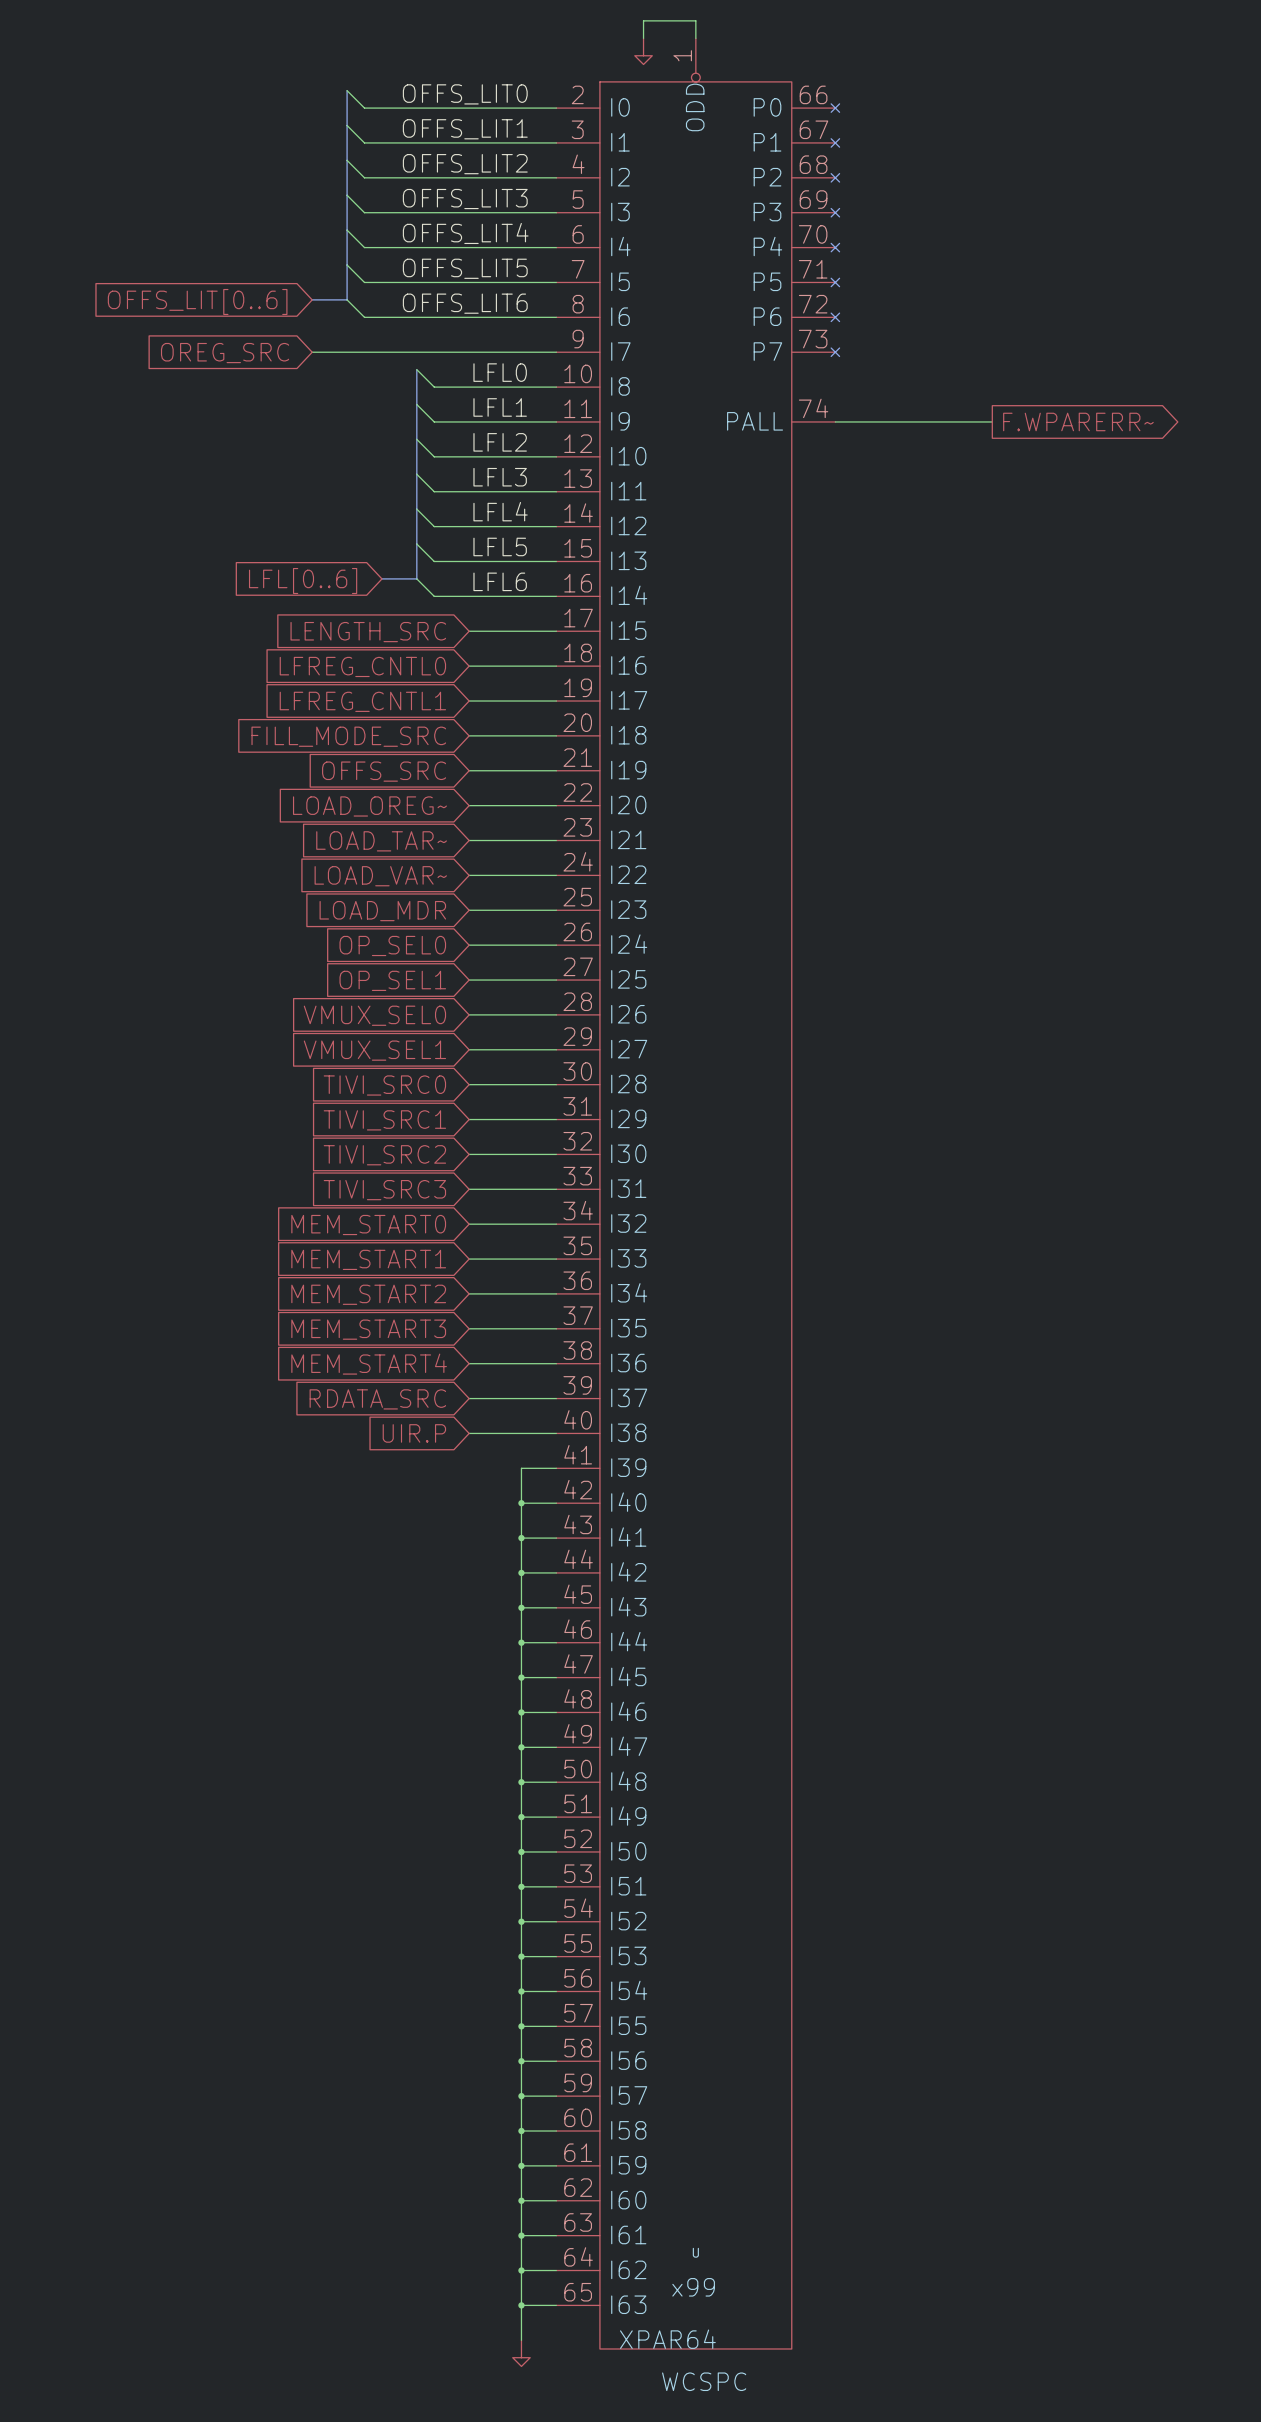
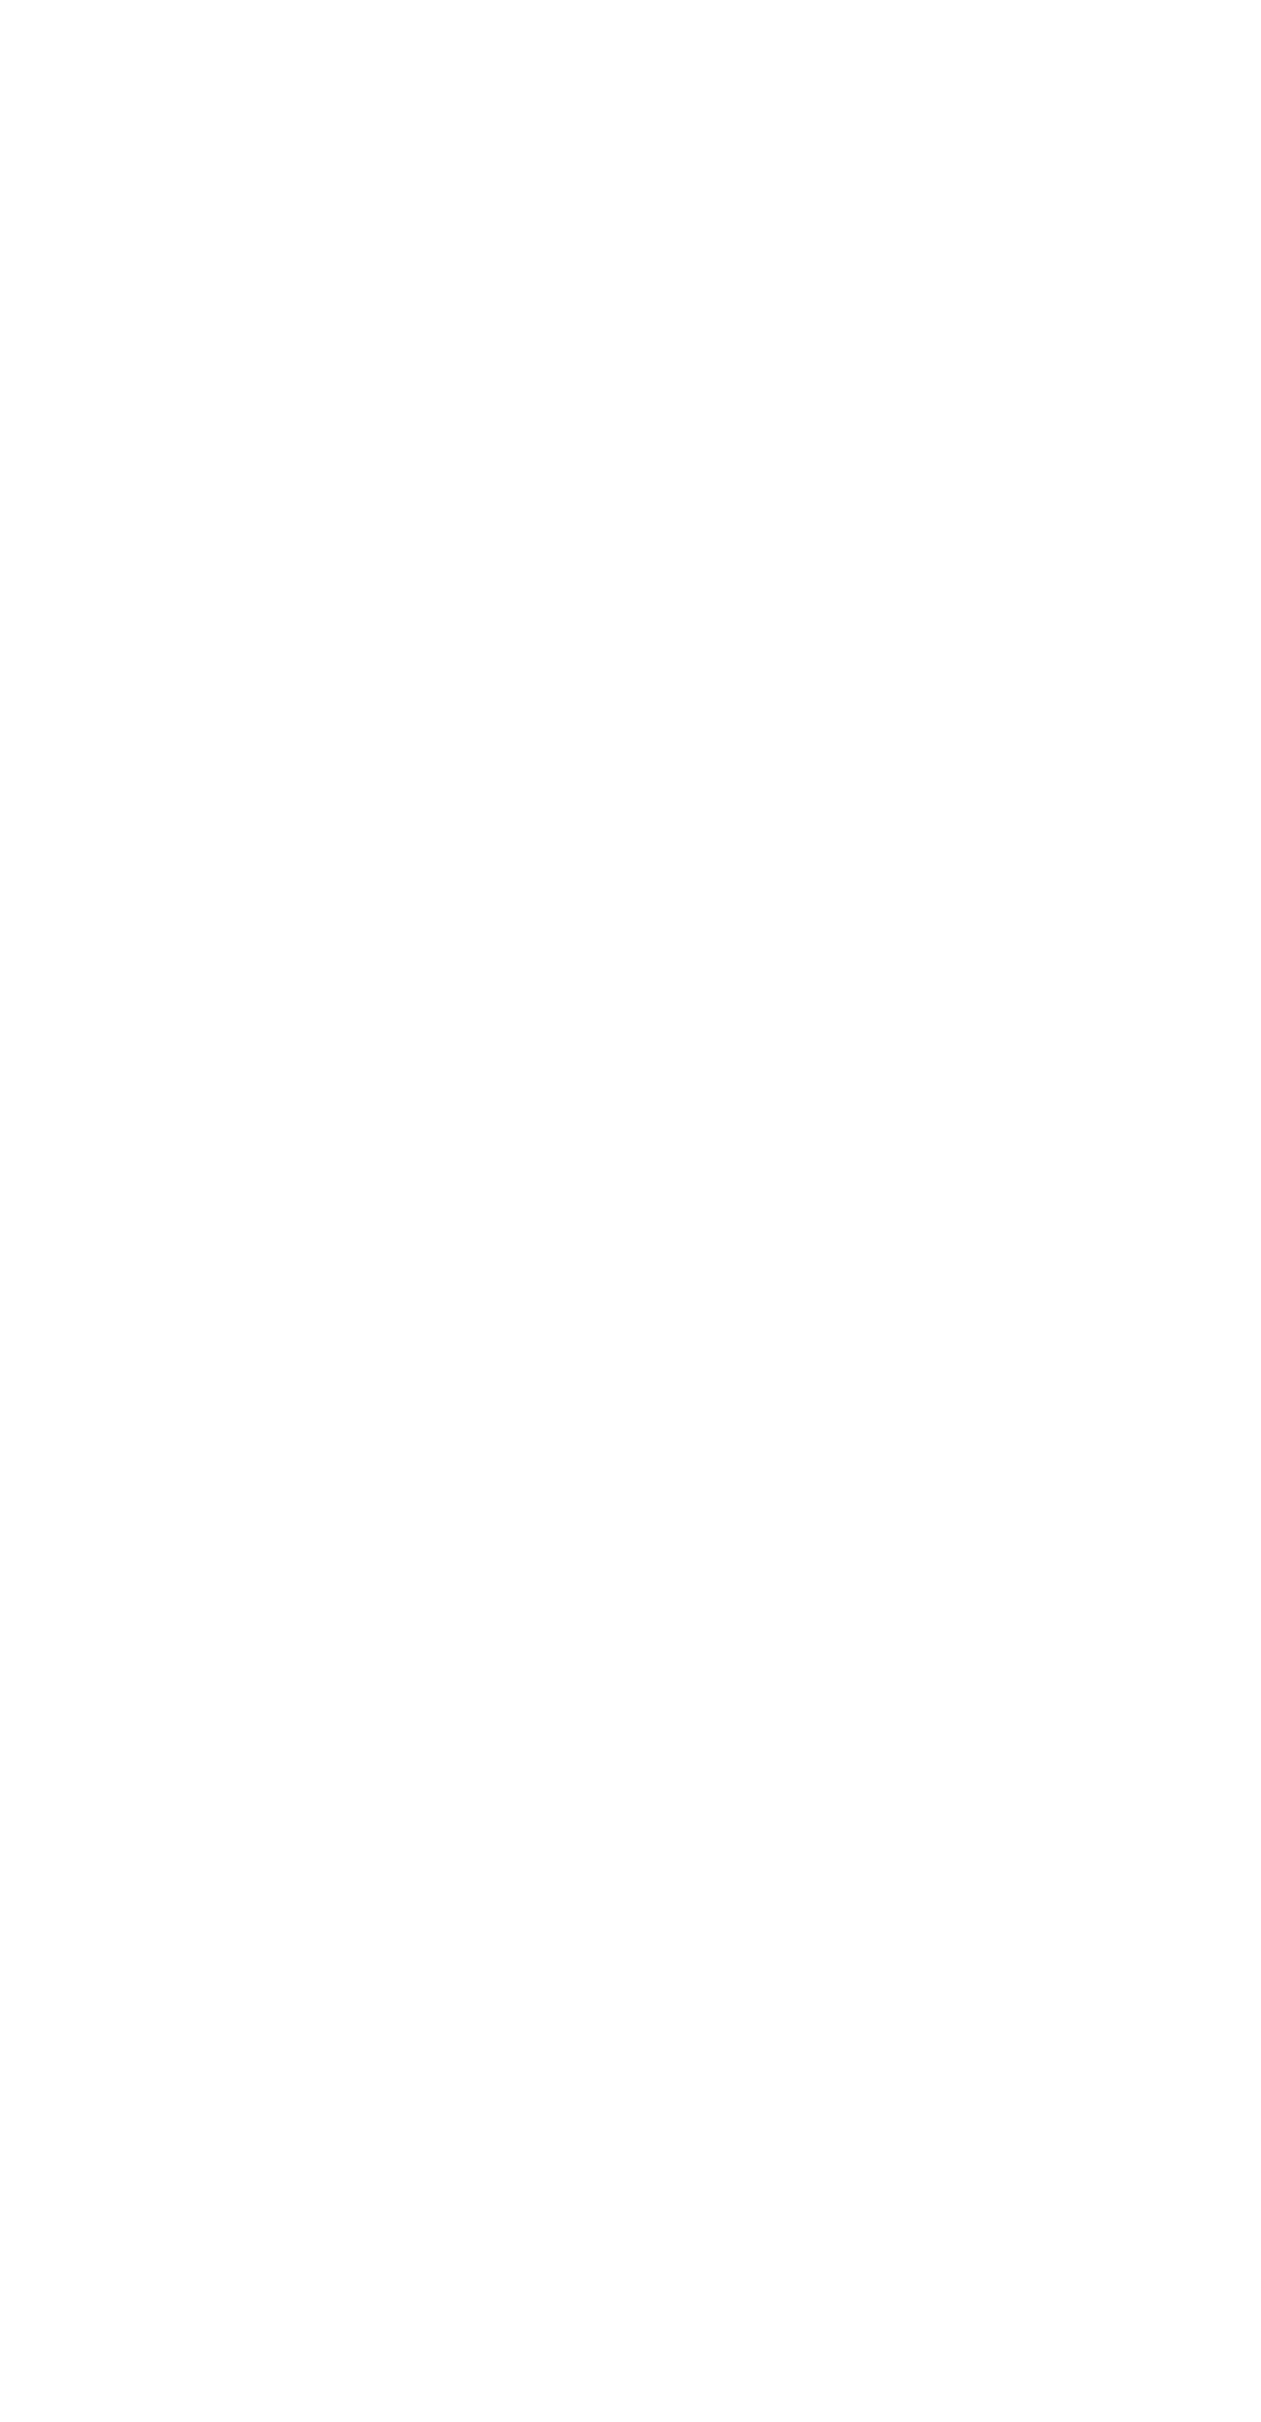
wire: (643, 38) (643, 20) (695, 20) (695, 38) -> none
power symbol: (643, 51) -> none
wire: (347, 90) (364, 108) (556, 108) -> none
bus: (347, 90) (347, 299) (312, 299) -> none
label: OFFS_LIT0 (465, 94) -> none
no-connect mark: (835, 108) -> none
wire: (347, 125) (364, 142) (556, 142) -> none
label: OFFS_LIT1 (465, 129) -> none
no-connect mark: (835, 142) -> none
wire: (347, 160) (364, 177) (556, 177) -> none
label: OFFS_LIT2 (465, 164) -> none
no-connect mark: (835, 177) -> none
wire: (347, 195) (364, 212) (556, 212) -> none
label: OFFS_LIT3 (465, 199) -> none
no-connect mark: (835, 212) -> none
wire: (347, 230) (364, 247) (556, 247) -> none
label: OFFS_LIT4 (465, 233) -> none
no-connect mark: (835, 247) -> none
wire: (347, 265) (364, 282) (556, 282) -> none
label: OFFS_LIT5 (465, 268) -> none
no-connect mark: (835, 282) -> none
wire: (347, 299) (364, 317) (556, 317) -> none
global label: OFFS_LIT[0..6] (197, 301) -> none
label: OFFS_LIT6 (465, 303) -> none
no-connect mark: (835, 317) -> none
wire: (312, 352) (556, 352) -> none
no-connect mark: (835, 352) -> none
global label: OREG_SRC (225, 353) -> none
wire: (416, 369) (434, 387) (556, 387) -> none
bus: (416, 369) (416, 578) (381, 578) -> none
label: LFL0 (500, 372) -> none
wire: (416, 404) (434, 421) (556, 421) -> none
label: LFL1 (500, 407) -> none
wire: (835, 421) (992, 421) -> none
global label: F.WPARERR~ (1078, 421) -> none
wire: (416, 439) (434, 456) (556, 456) -> none
label: LFL2 (500, 442) -> none
wire: (416, 474) (434, 491) (556, 491) -> none
label: LFL3 (500, 477) -> none
wire: (416, 509) (434, 526) (556, 526) -> none
label: LFL4 (500, 511) -> none
wire: (416, 544) (434, 561) (556, 561) -> none
label: LFL5 (500, 546) -> none
wire: (416, 578) (434, 596) (556, 596) -> none
global label: LFL[0..6] (303, 581) -> none
label: LFL6 (500, 581) -> none
wire: (469, 631) (556, 631) -> none
global label: LENGTH_SRC (368, 632) -> none
global label: LFREG_CNTL0 (362, 666) -> none
wire: (469, 666) (556, 666) -> none
global label: LFREG_CNTL1 (362, 701) -> none
wire: (469, 701) (556, 701) -> none
wire: (469, 735) (556, 735) -> none
global label: FILL_MODE_SRC (348, 736) -> none
wire: (469, 770) (556, 770) -> none
global label: OFFS_SRC (384, 771) -> none
wire: (469, 805) (556, 805) -> none
global label: LOAD_OREG~ (369, 806) -> none
wire: (469, 840) (556, 840) -> none
global label: LOAD_TAR~ (381, 841) -> none
wire: (469, 875) (556, 875) -> none
global label: LOAD_VAR~ (380, 876) -> none
wire: (469, 910) (556, 910) -> none
global label: LOAD_MDR (382, 911) -> none
global label: OP_SEL0 (392, 945) -> none
wire: (469, 945) (556, 945) -> none
global label: OP_SEL1 (392, 980) -> none
wire: (469, 980) (556, 980) -> none
wire: (469, 1014) (556, 1014) -> none
global label: VMUX_SEL0 (374, 1015) -> none
wire: (469, 1049) (556, 1049) -> none
global label: VMUX_SEL1 (374, 1050) -> none
wire: (469, 1084) (556, 1084) -> none
global label: TIVI_SRC0 (384, 1085) -> none
wire: (469, 1119) (556, 1119) -> none
global label: TIVI_SRC1 (384, 1120) -> none
wire: (469, 1154) (556, 1154) -> none
global label: TIVI_SRC2 (384, 1155) -> none
wire: (469, 1189) (556, 1189) -> none
global label: TIVI_SRC3 (384, 1190) -> none
U: XPAR64 (695, 1193) -> none
wire: (469, 1224) (556, 1224) -> none
global label: MEM_START0 (368, 1225) -> none
global label: MEM_START1 (368, 1259) -> none
wire: (469, 1259) (556, 1259) -> none
wire: (469, 1293) (556, 1293) -> none
global label: MEM_START2 (368, 1294) -> none
wire: (469, 1328) (556, 1328) -> none
global label: MEM_START3 (368, 1329) -> none
wire: (469, 1363) (556, 1363) -> none
global label: MEM_START4 (369, 1364) -> none
wire: (469, 1398) (556, 1398) -> none
global label: RDATA_SRC (377, 1399) -> none
global label: UIR.P (414, 1433) -> none
wire: (469, 1433) (556, 1433) -> none
wire: (556, 1468) (521, 1468) (521, 2340) -> none
wire: (521, 1503) (556, 1503) -> none
junction: (521, 1503) -> none
wire: (521, 1538) (556, 1538) -> none
junction: (521, 1538) -> none
wire: (521, 1572) (556, 1572) -> none
junction: (521, 1572) -> none
wire: (521, 1607) (556, 1607) -> none
junction: (521, 1607) -> none
wire: (521, 1642) (556, 1642) -> none
junction: (521, 1642) -> none
wire: (521, 1677) (556, 1677) -> none
junction: (521, 1677) -> none
wire: (521, 1712) (556, 1712) -> none
junction: (521, 1712) -> none
wire: (521, 1747) (556, 1747) -> none
junction: (521, 1747) -> none
wire: (521, 1782) (556, 1782) -> none
junction: (521, 1782) -> none
wire: (521, 1817) (556, 1817) -> none
junction: (521, 1817) -> none
wire: (521, 1851) (556, 1851) -> none
junction: (521, 1851) -> none
wire: (521, 1886) (556, 1886) -> none
junction: (521, 1886) -> none
wire: (521, 1921) (556, 1921) -> none
junction: (521, 1921) -> none
wire: (521, 1956) (556, 1956) -> none
junction: (521, 1956) -> none
wire: (521, 1991) (556, 1991) -> none
junction: (521, 1991) -> none
wire: (521, 2026) (556, 2026) -> none
junction: (521, 2026) -> none
wire: (521, 2061) (556, 2061) -> none
junction: (521, 2061) -> none
wire: (521, 2096) (556, 2096) -> none
junction: (521, 2096) -> none
wire: (521, 2131) (556, 2131) -> none
junction: (521, 2131) -> none
wire: (521, 2165) (556, 2165) -> none
junction: (521, 2165) -> none
wire: (521, 2200) (556, 2200) -> none
junction: (521, 2200) -> none
wire: (521, 2235) (556, 2235) -> none
junction: (521, 2235) -> none
wire: (521, 2270) (556, 2270) -> none
junction: (521, 2270) -> none
wire: (521, 2305) (556, 2305) -> none
junction: (521, 2305) -> none
power symbol: (521, 2353) -> none

